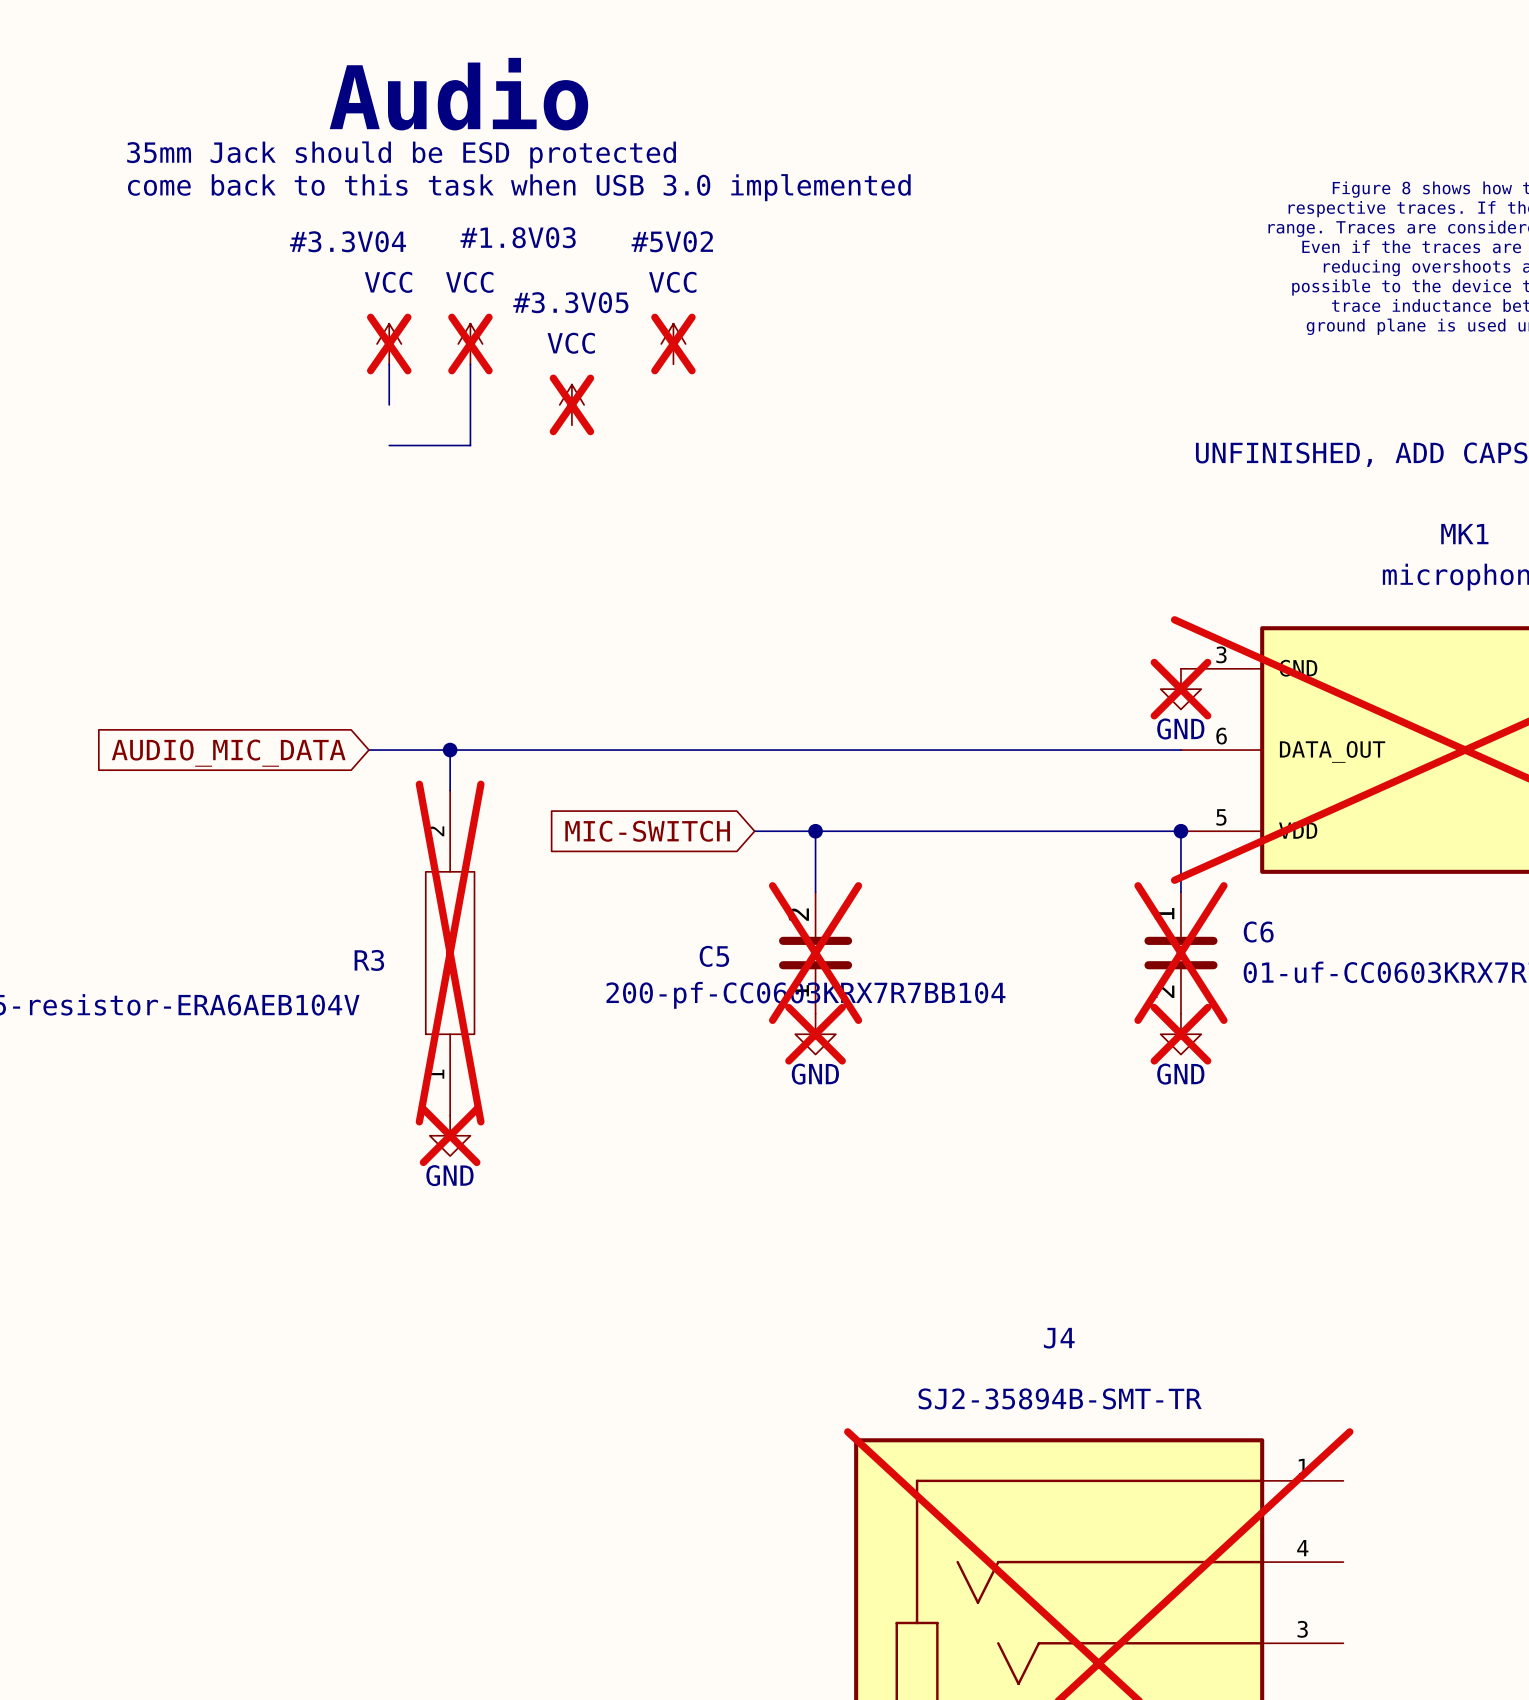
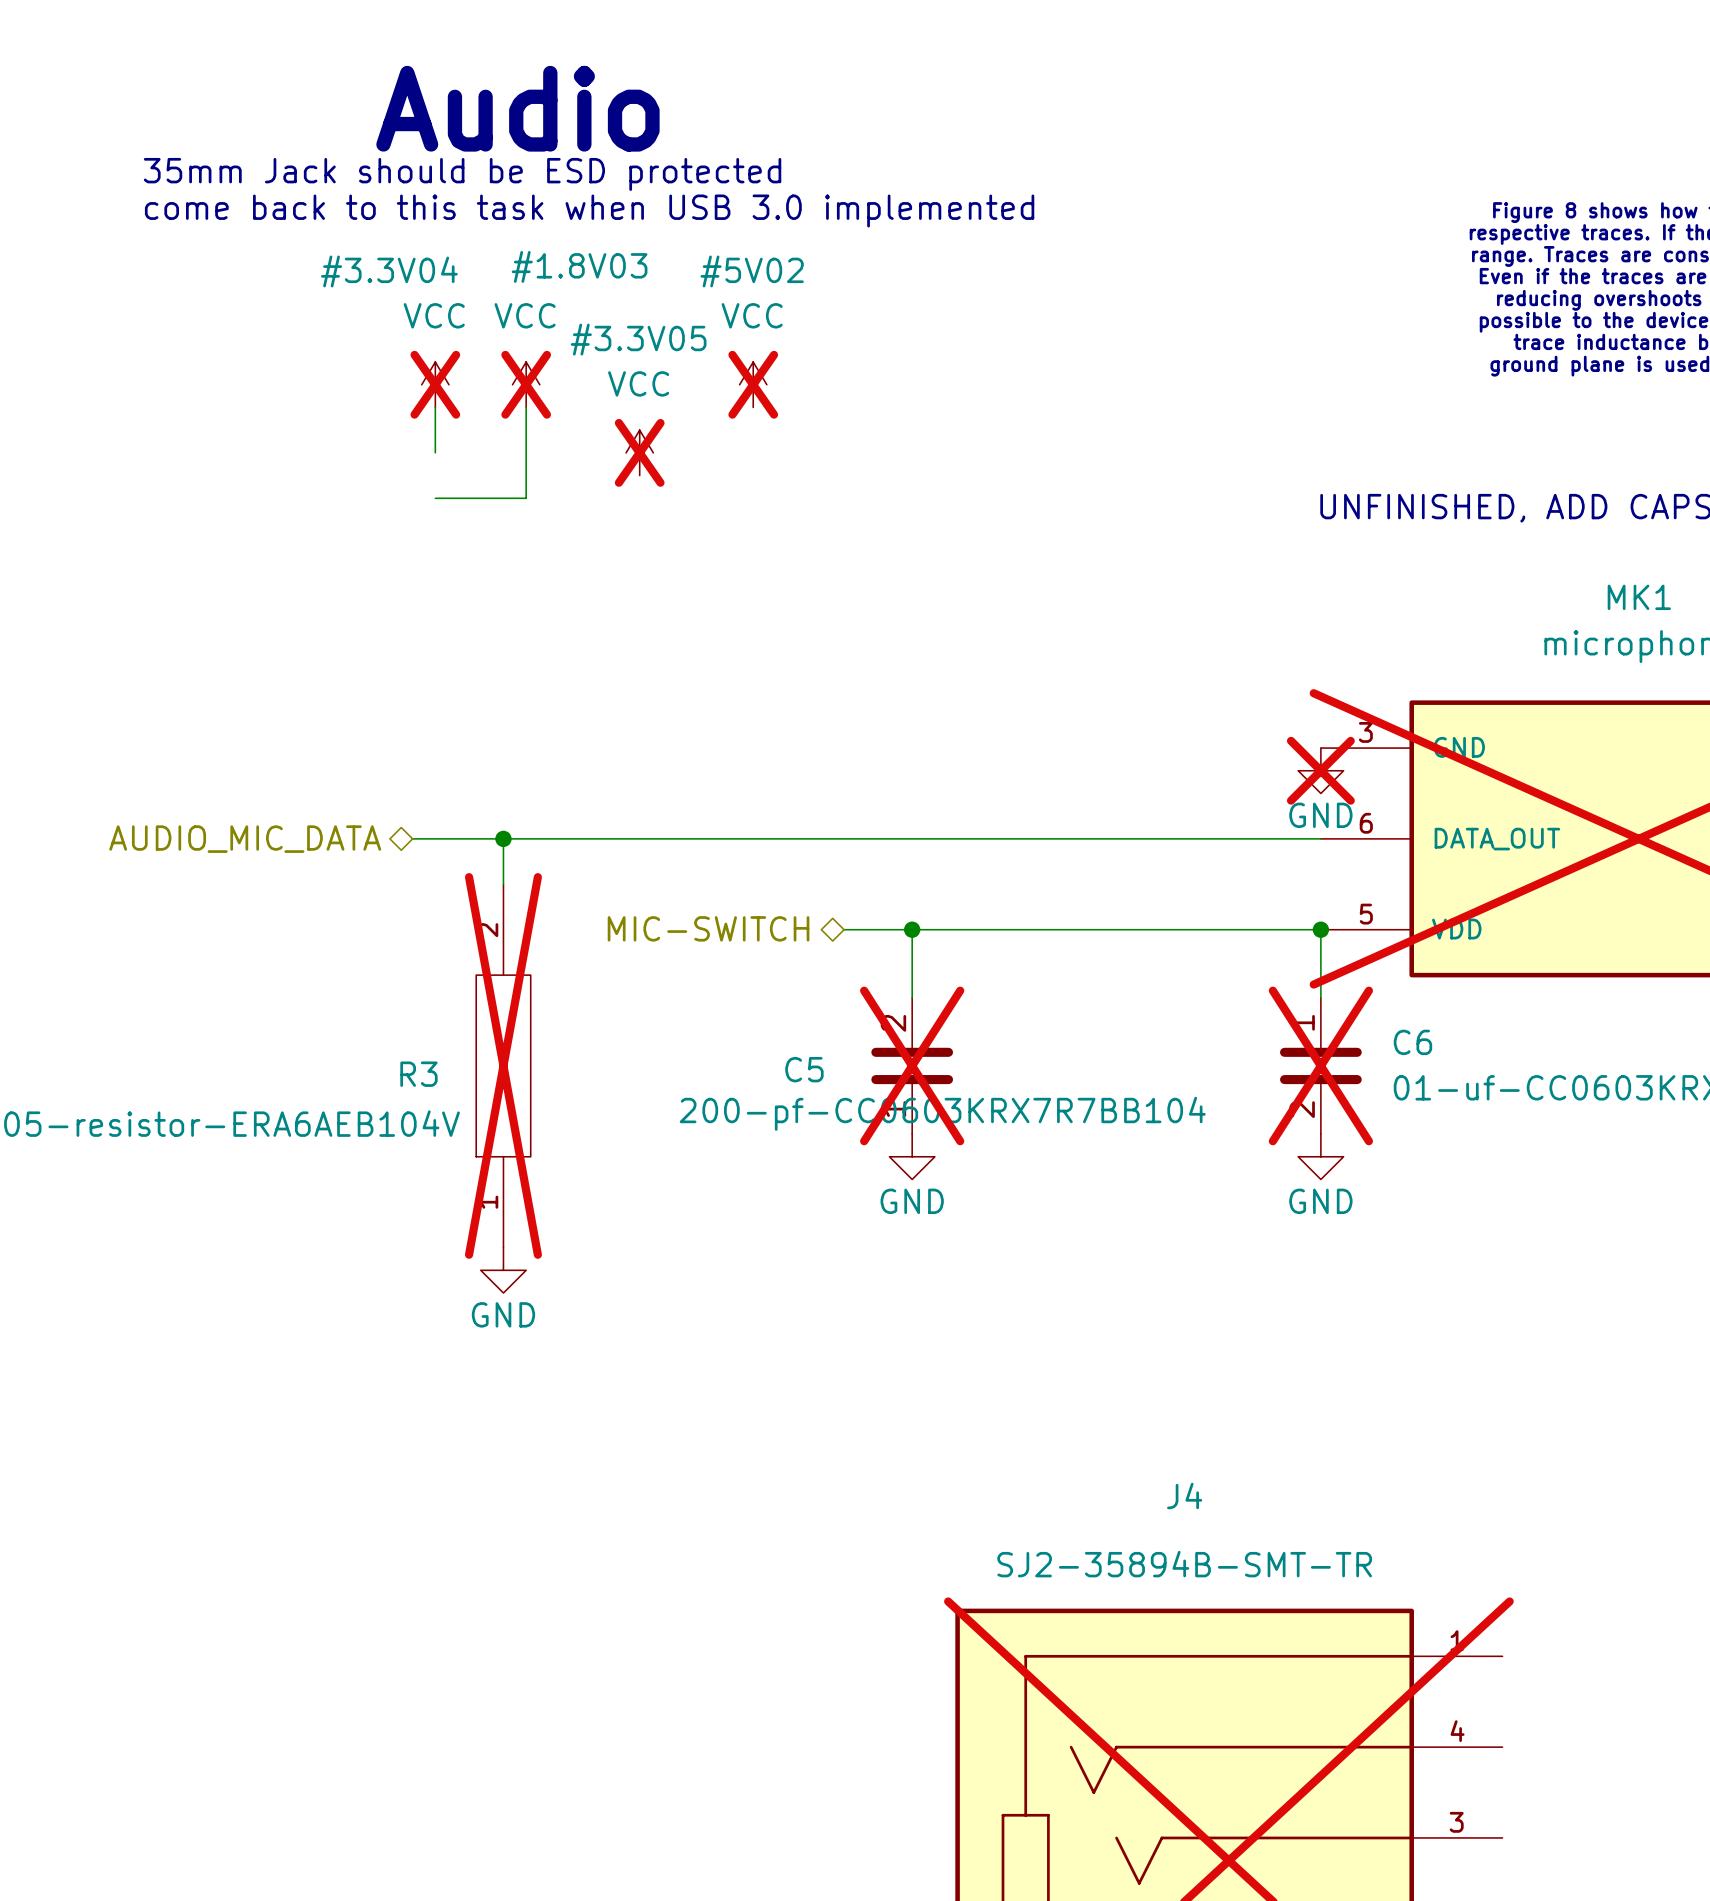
hierarchical label: none -> AUDIO_MIC_DATA (245, 839)
global label: AUDIO_MIC_DATA (228, 753) -> none
hierarchical label: none -> MIC-SWITCH (708, 928)
global label: MIC-SWITCH (647, 831) -> none
power symbol do-not-place cross: (815, 1034) -> none
power symbol do-not-place cross: (1180, 1034) -> none
power symbol do-not-place cross: (450, 1135) -> none

